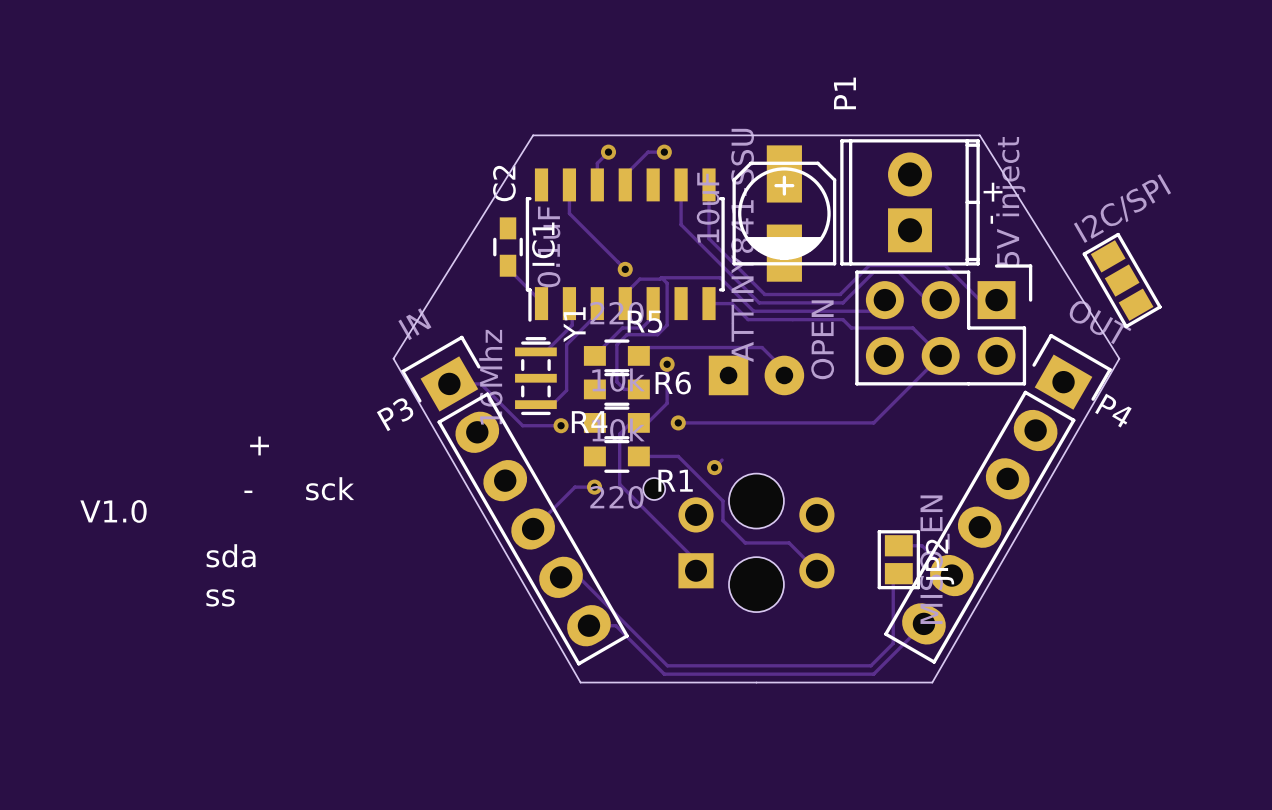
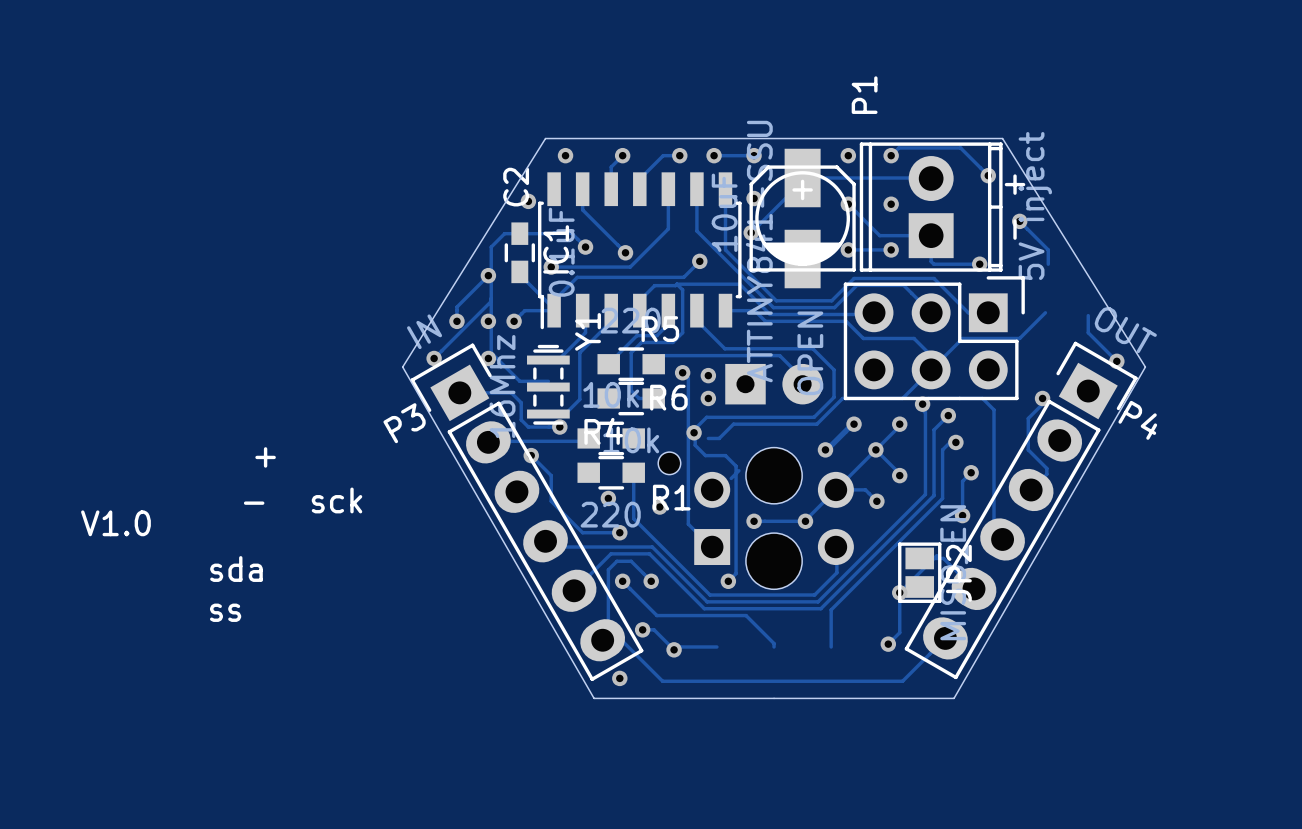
via: none -> (565, 155)
track: none -> (714, 155) (754, 155)
via: none -> (714, 155)
via: none -> (754, 155)
via: none -> (848, 155)
track: none -> (891, 155) (898, 147) (960, 147) (988, 175)
via: none -> (891, 155)
via: none -> (988, 175)
track: none -> (931, 178) (802, 178) (802, 181) (751, 232)
track: none -> (668, 189) (668, 228) (630, 267) (551, 267)
via: none -> (754, 198)
via: none -> (528, 201)
track: none -> (848, 204) (879, 235) (931, 235) (931, 261) (933, 264) (979, 264)
via: none -> (848, 204)
via: none -> (891, 204)
track: (569, 205) (569, 213) (625, 269) -> (582, 209) (625, 252)
track: none -> (1019, 221) (1048, 249) (1048, 264)
via: none -> (1019, 221)
track: (681, 224) (759, 302) (843, 302) (873, 272) -> (725, 244) (725, 249) (776, 300) (831, 300) (854, 278) (894, 278)
track: none -> (696, 229) (773, 307) (834, 307) (856, 285) (903, 285) (931, 312)
via: none -> (751, 232)
track: (709, 238) (764, 294) (840, 294) (869, 265) (945, 265) (979, 300) (996, 300) -> none
track: none -> (585, 247) (571, 232) (504, 233) (491, 247) (491, 352) (519, 381) (548, 381)
via: none -> (585, 247)
track: none -> (848, 249) (891, 249)
via: none -> (848, 249)
via: none -> (891, 249)
track: none -> (699, 261) (683, 277) (577, 277) (554, 300) (554, 309)
via: none -> (699, 261)
via: none -> (979, 264)
via: none -> (551, 267)
track: none -> (488, 275) (456, 307) (456, 321)
via: none -> (488, 275)
via position: (625, 269) -> (625, 252)
track: (898, 272) (926, 300) (940, 300) -> (919, 278) (934, 278) (968, 312) (988, 312)
track: (720, 277) (753, 311) (884, 311) (884, 300) -> (736, 284) (739, 284) (770, 314) (863, 314) (874, 312)
part: I2C/SPI (1122, 280) -> none
track: none -> (491, 301) (434, 358)
track: none -> (554, 310) (524, 310) (514, 321)
track: none -> (696, 310) (696, 320) (724, 348) (812, 348) (834, 369) (834, 397) (814, 417) (706, 417) (695, 428) (695, 445) (705, 455) (725, 455) (736, 466) (736, 573) (728, 581)
track: (732, 303) (748, 319) (843, 319) (851, 328) (912, 328) (940, 355) (907, 389) -> (749, 310) (754, 309) (765, 321) (846, 321) (863, 338) (914, 338) (931, 355) (931, 369)
track: none -> (1045, 312) (1019, 338) (962, 338) (902, 398) (842, 398) (816, 424) (733, 424) (719, 438) (708, 438)
track: none -> (1088, 315) (1088, 332) (1116, 361)
via: none -> (456, 321)
via: none -> (488, 321)
via: none -> (514, 321)
part position: (943, 324) -> (934, 338)
via: none -> (434, 358)
via: none -> (488, 358)
via: none -> (1116, 361)
track: (667, 364) (667, 403) (647, 422) (630, 422) (619, 434) (619, 484) (696, 560) (696, 570) -> (682, 372) (688, 378) (688, 524) (712, 547)
via: none -> (708, 375)
track: (480, 383) (522, 425) (561, 425) -> (492, 392) (511, 392) (521, 402) (521, 419) (528, 427) (559, 427)
via: none -> (708, 398)
track: none -> (928, 398) (982, 398) (994, 409) (994, 530) (1002, 539)
track: none -> (1042, 398) (1042, 404) (1028, 418) (1028, 449) (1046, 468) (1046, 474) (1031, 489)
via: none -> (1042, 398)
track: (901, 395) (873, 422) (678, 422) -> (922, 404) (922, 409) (925, 412) (925, 494) (818, 601) (707, 601) (652, 547) (551, 547) (545, 541)
via: none -> (922, 404)
track: none -> (948, 415) (934, 429) (934, 495) (820, 608) (704, 608) (649, 553) (611, 553) (575, 589)
via: none -> (948, 415)
via: none -> (854, 424)
track: none -> (899, 424) (805, 521) (754, 521)
via: none -> (899, 424)
R6 position: (616, 422) -> (611, 438)
via position: (561, 425) -> (559, 427)
track: none -> (588, 438) (585, 441) (489, 441)
track: none -> (955, 442) (950, 442) (942, 449) (942, 498) (831, 609) (831, 646)
via: none -> (955, 442)
track: none -> (825, 449) (851, 424) (854, 424) (831, 447) (831, 449)
via: none -> (825, 449)
track: none -> (875, 449) (899, 475)
via: none -> (875, 449)
track: none -> (531, 455) (551, 475) (551, 501) (582, 532) (619, 532)
via: none -> (531, 455)
R1 position: (616, 456) -> (611, 472)
track: (638, 456) (678, 456) (722, 501) (722, 520) (745, 542) (789, 542) (816, 570) -> none
track: none -> (633, 472) (633, 518) (710, 595) (814, 595) (836, 572) (835, 547)
track: none -> (971, 472) (962, 481) (962, 515)
via: none -> (971, 472)
via: none -> (899, 475)
via: (714, 467) -> none
track: none -> (835, 489) (865, 489) (876, 501)
track: (594, 487) (575, 487) (533, 529) -> none
via: none -> (876, 501)
via: none -> (659, 507)
via: none -> (962, 515)
via: none -> (754, 521)
via: none -> (805, 521)
via: none -> (619, 532)
part position: (738, 542) -> (756, 518)
track: none -> (936, 555) (899, 592) (899, 632) (888, 644)
track: none -> (622, 581) (656, 615) (746, 615) (774, 643) (774, 646)
via: none -> (622, 581)
track: none -> (651, 581) (631, 561) (616, 561) (608, 569) (608, 634) (602, 640)
via: none -> (651, 581)
via: none -> (728, 581)
track: (898, 573) (893, 579) (893, 643) (870, 665) -> (902, 681) (891, 681)
track: (561, 576) (578, 576) (667, 665) -> (621, 640) (662, 681) (683, 681)
via: none -> (899, 592)
track: none -> (642, 629) (654, 629) (674, 649) (676, 646) (716, 646)
via: none -> (642, 629)
track: (607, 625) (615, 625) (664, 674) (873, 674) (882, 665) -> none
via: none -> (888, 644)
via: none -> (674, 649)
via: none -> (619, 678)

